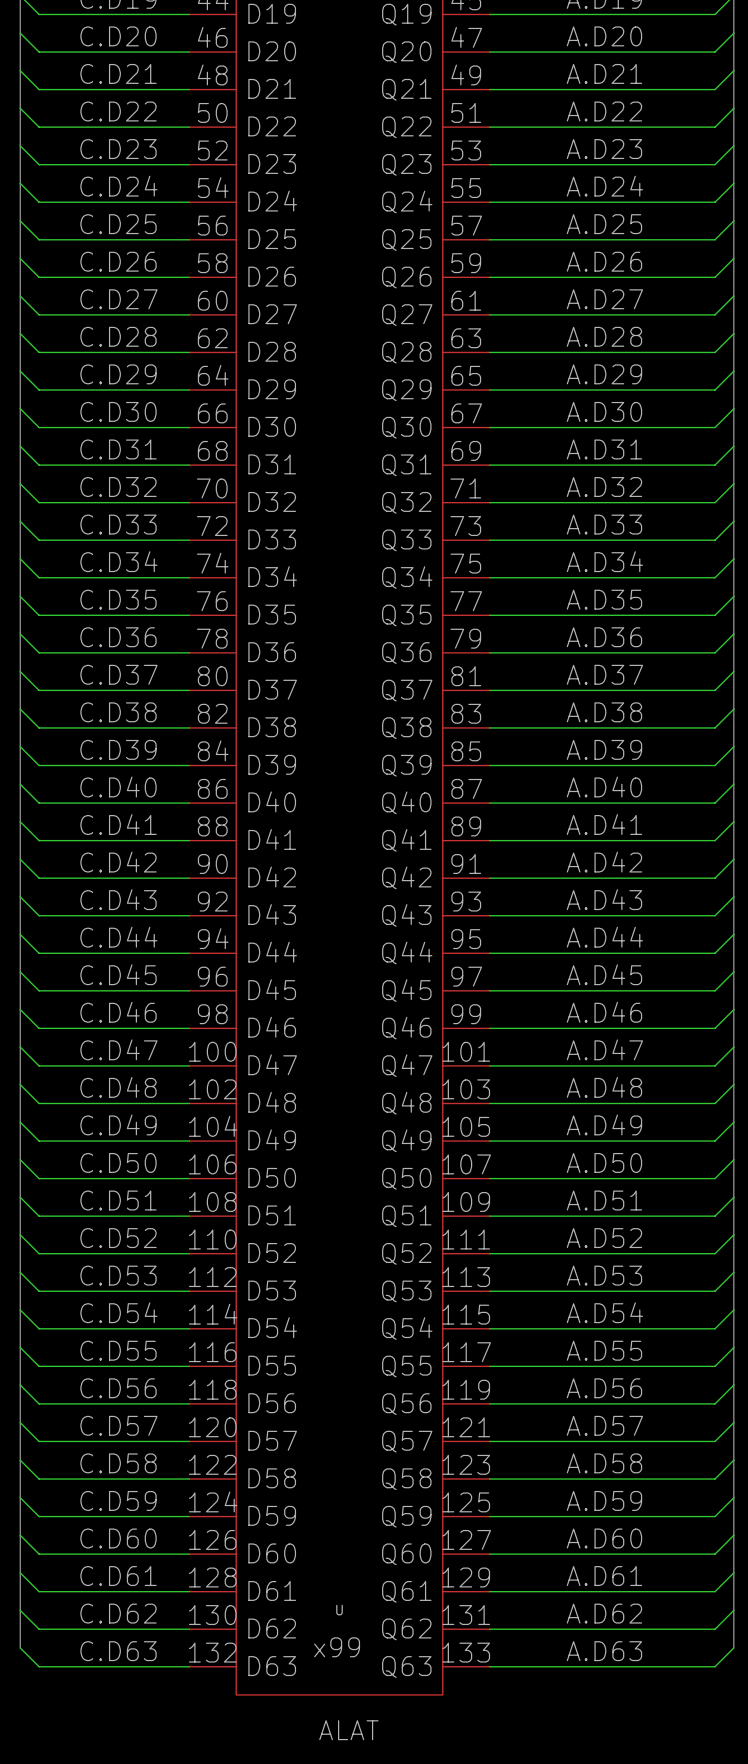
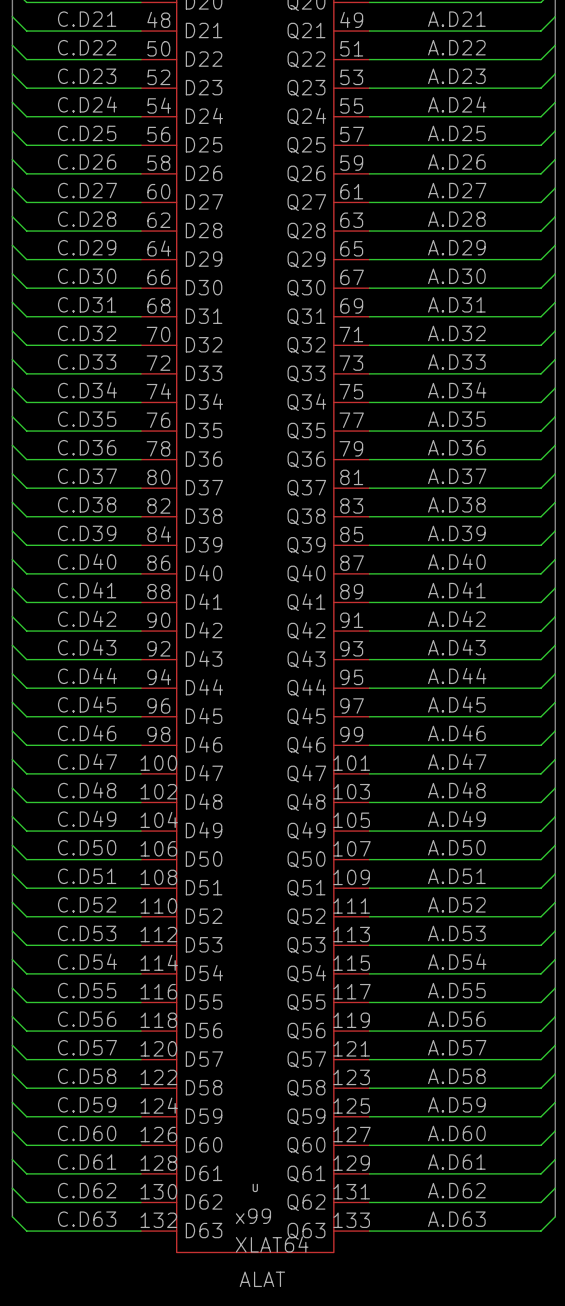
U value: none -> XLAT64 (272, 1244)

